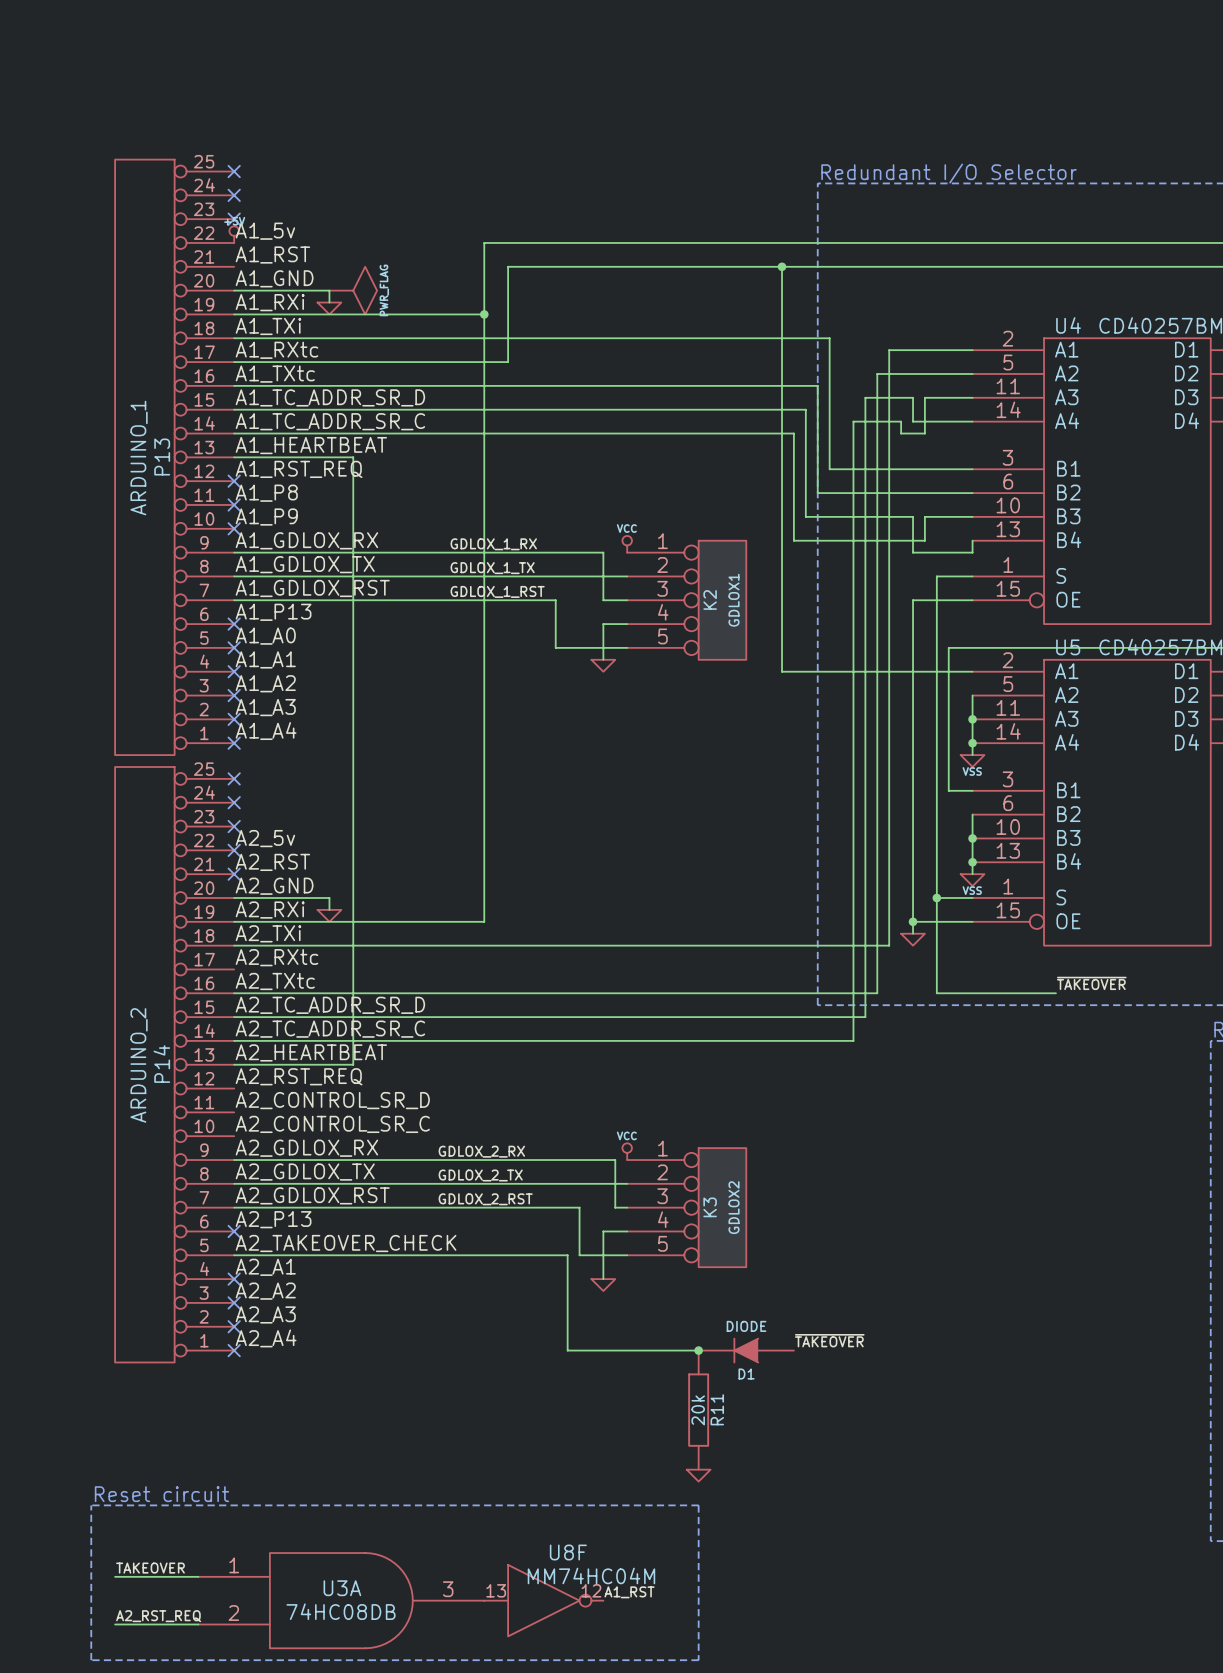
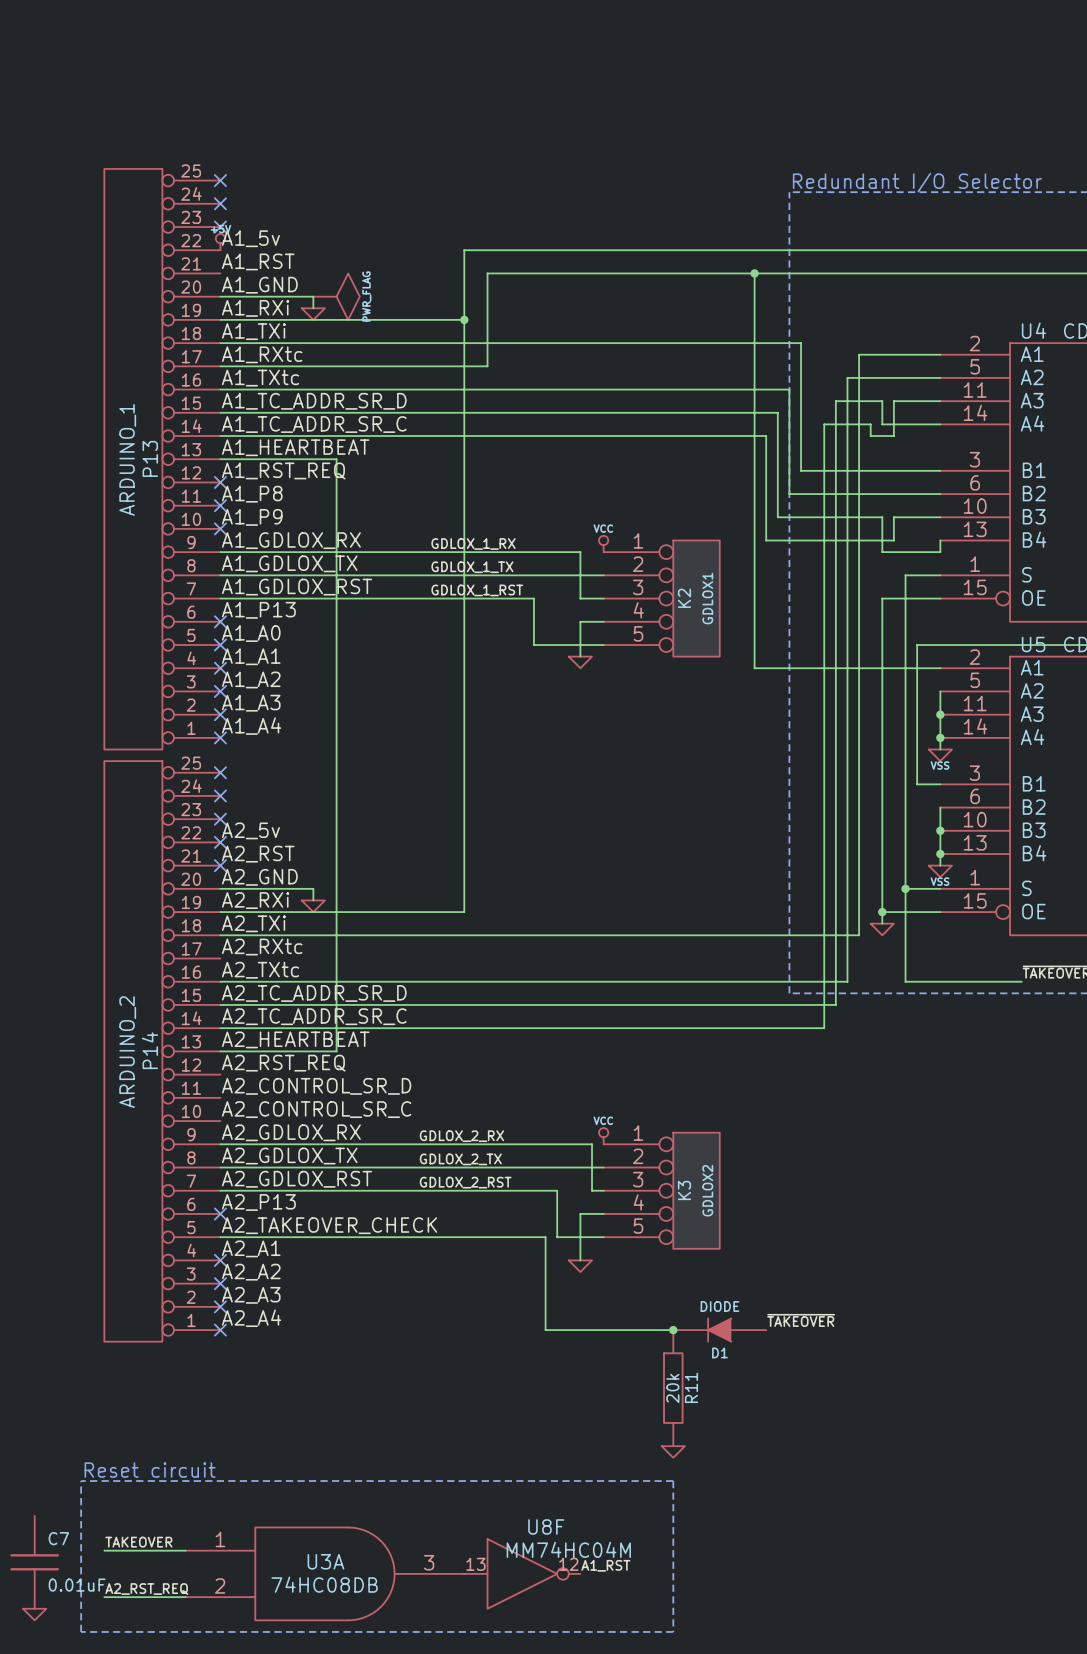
C7: none -> 0.01uF (34, 1562)
power symbol: none -> (34, 1614)

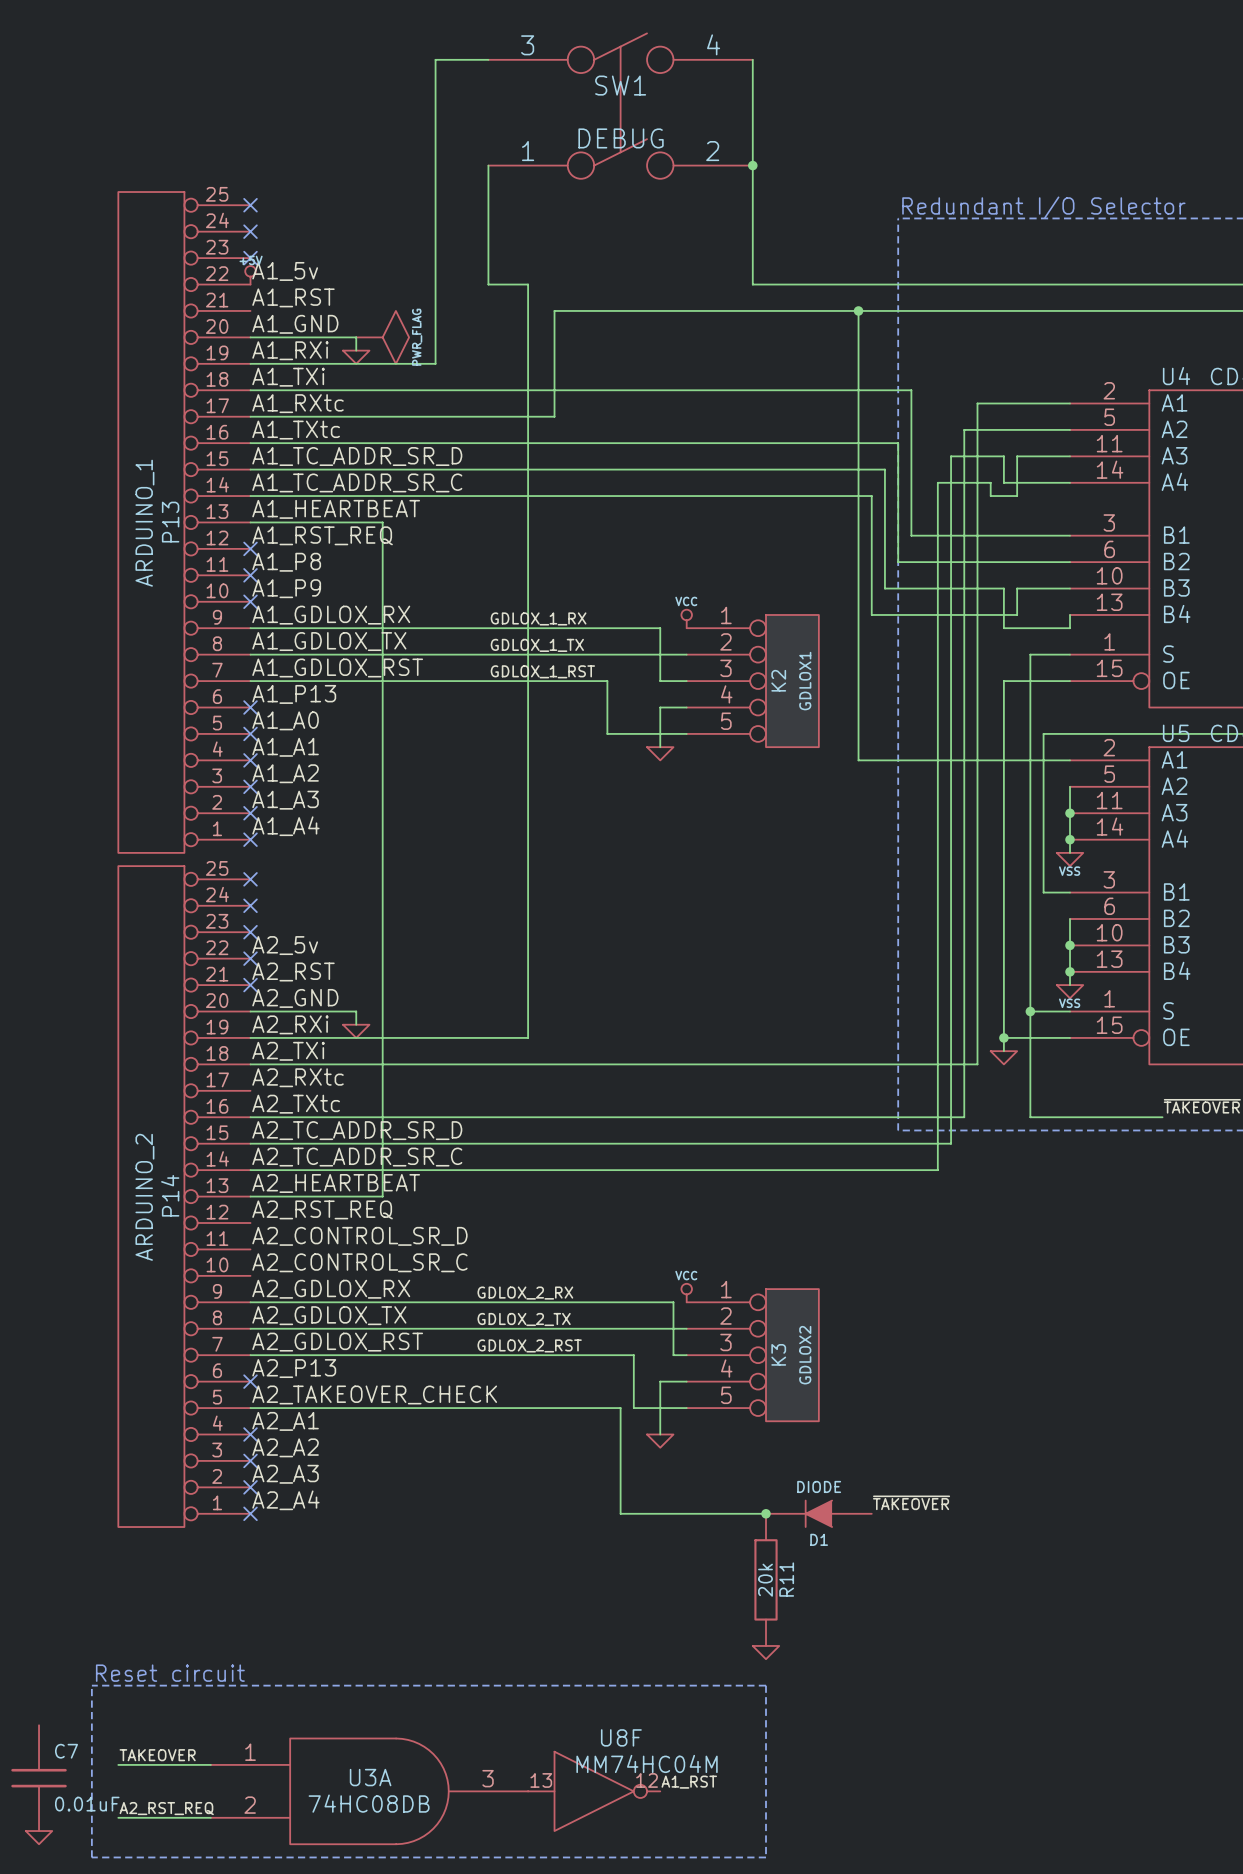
wire: none -> (752, 59) (752, 284)
SW1: none -> DEBUG (620, 106)
junction: none -> (752, 165)
wire: (464, 250) (661, 250) -> (528, 284) (488, 284) (488, 165)
wire: (383, 319) (464, 319) -> (435, 363) (435, 59) (488, 59)
junction: (464, 319) -> none

